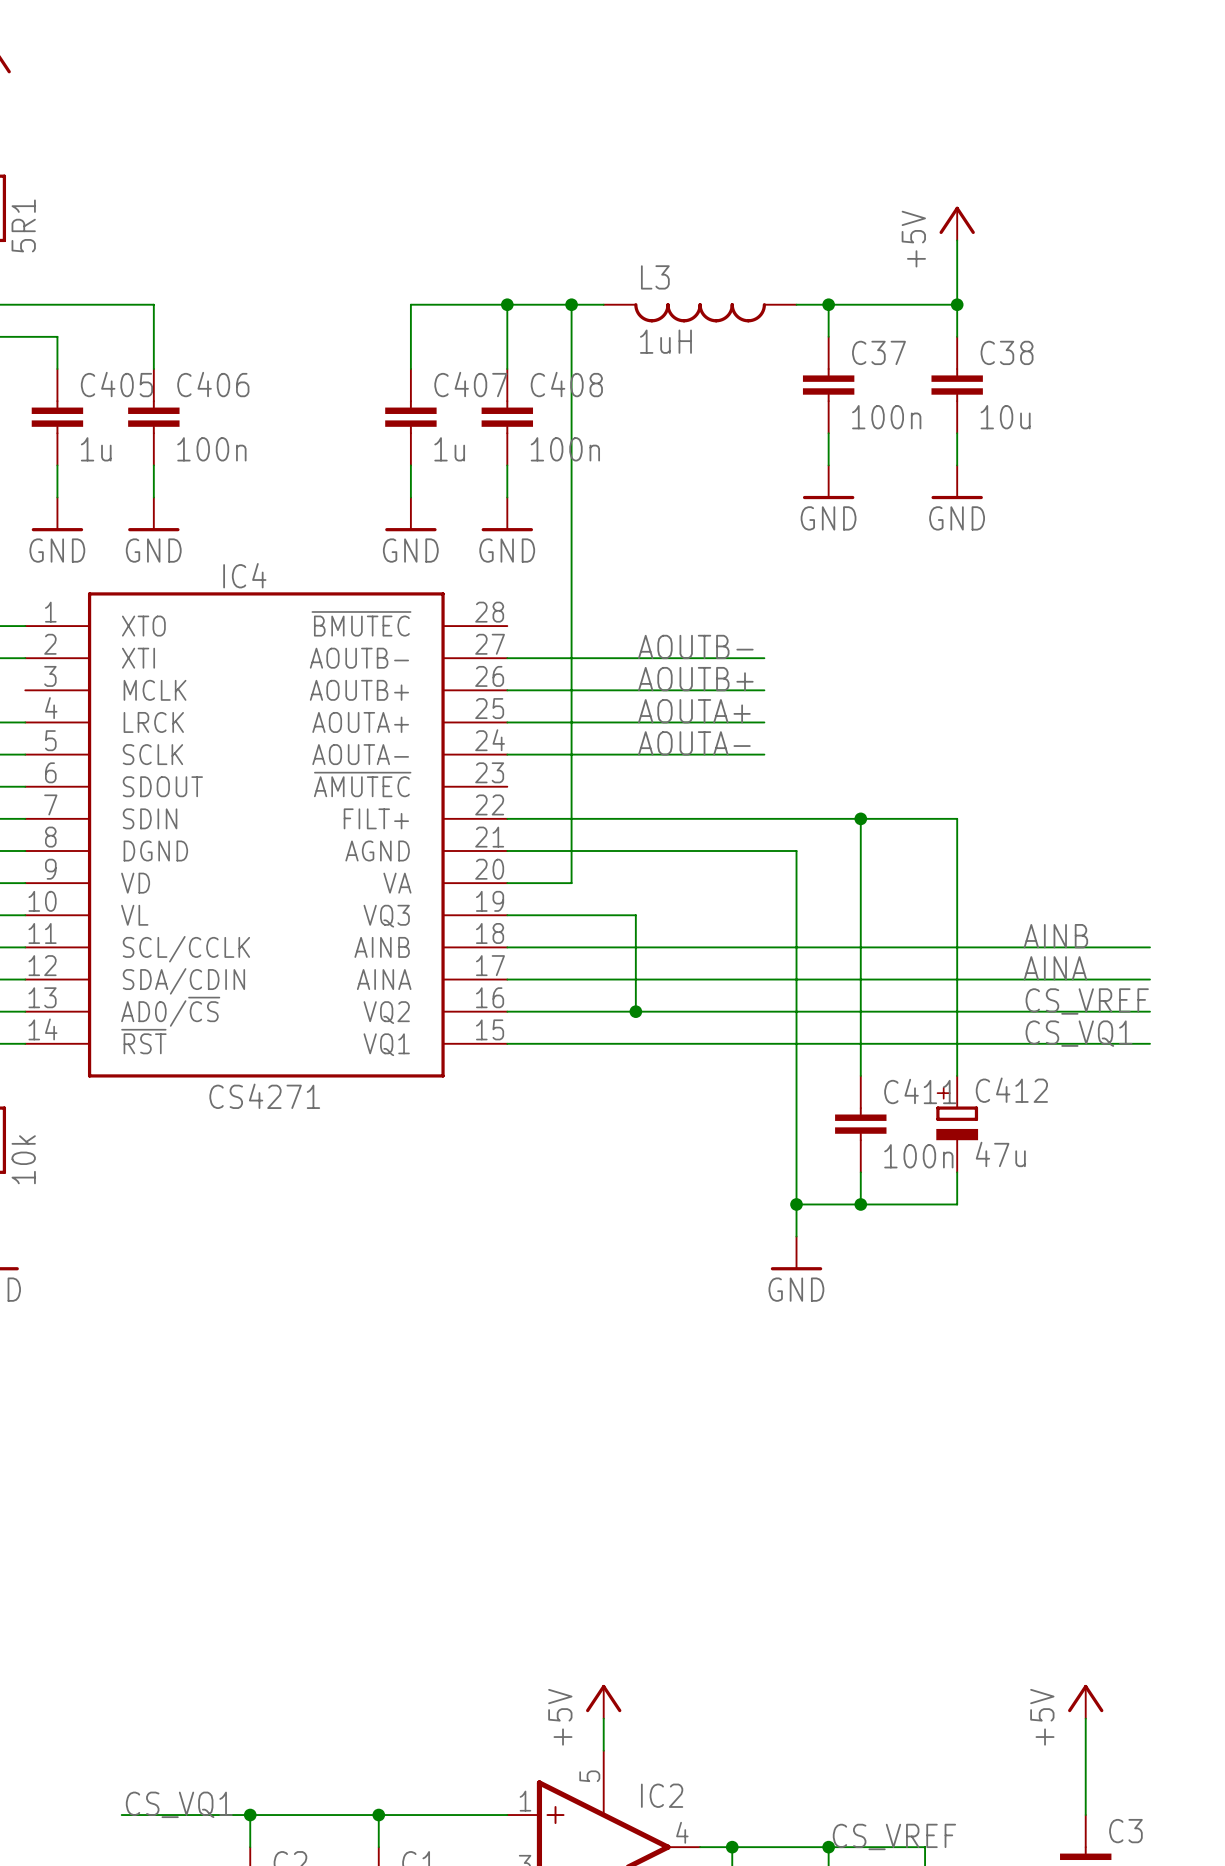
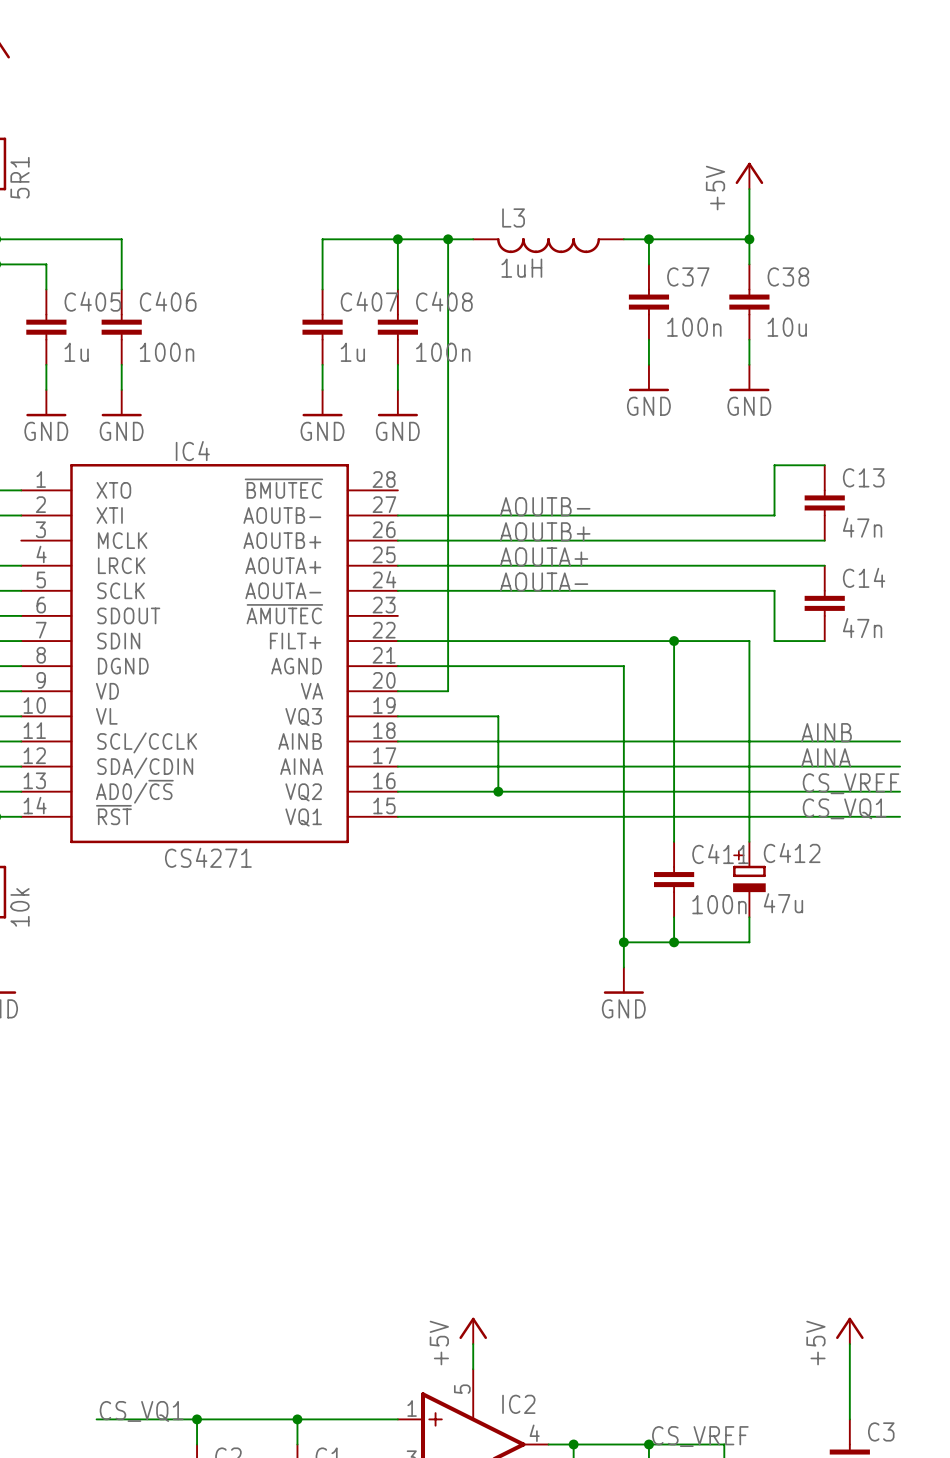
wire: none -> (824, 465) (774, 465) (774, 515) (598, 515)
C13: none -> 47n (824, 502)
wire: none -> (598, 540) (824, 540)
wire: none -> (598, 565) (824, 565)
wire: none -> (598, 590) (774, 590) (774, 641) (824, 641)
C14: none -> 47n (824, 603)

